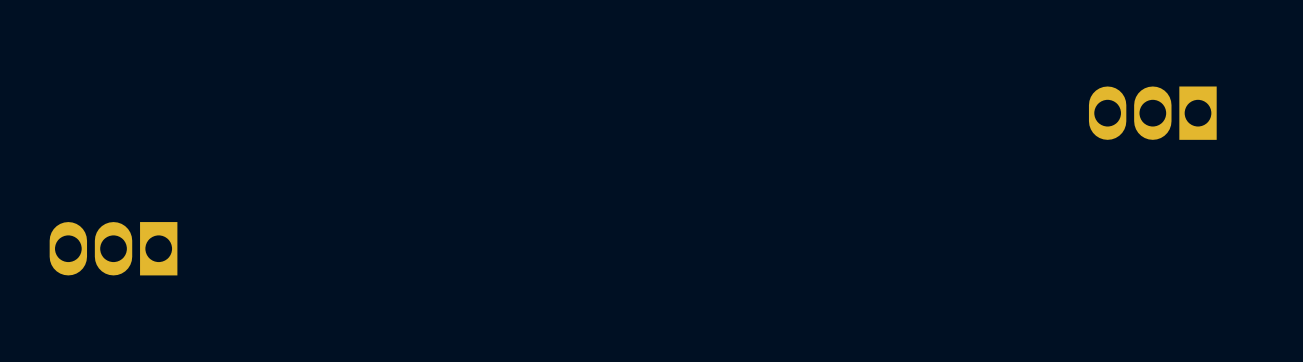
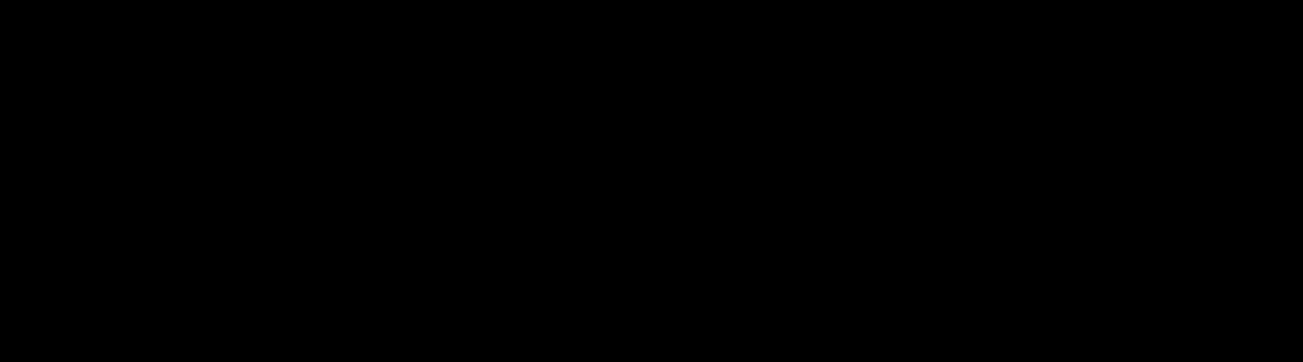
part: (1152, 113) -> none
part: (113, 248) -> none

